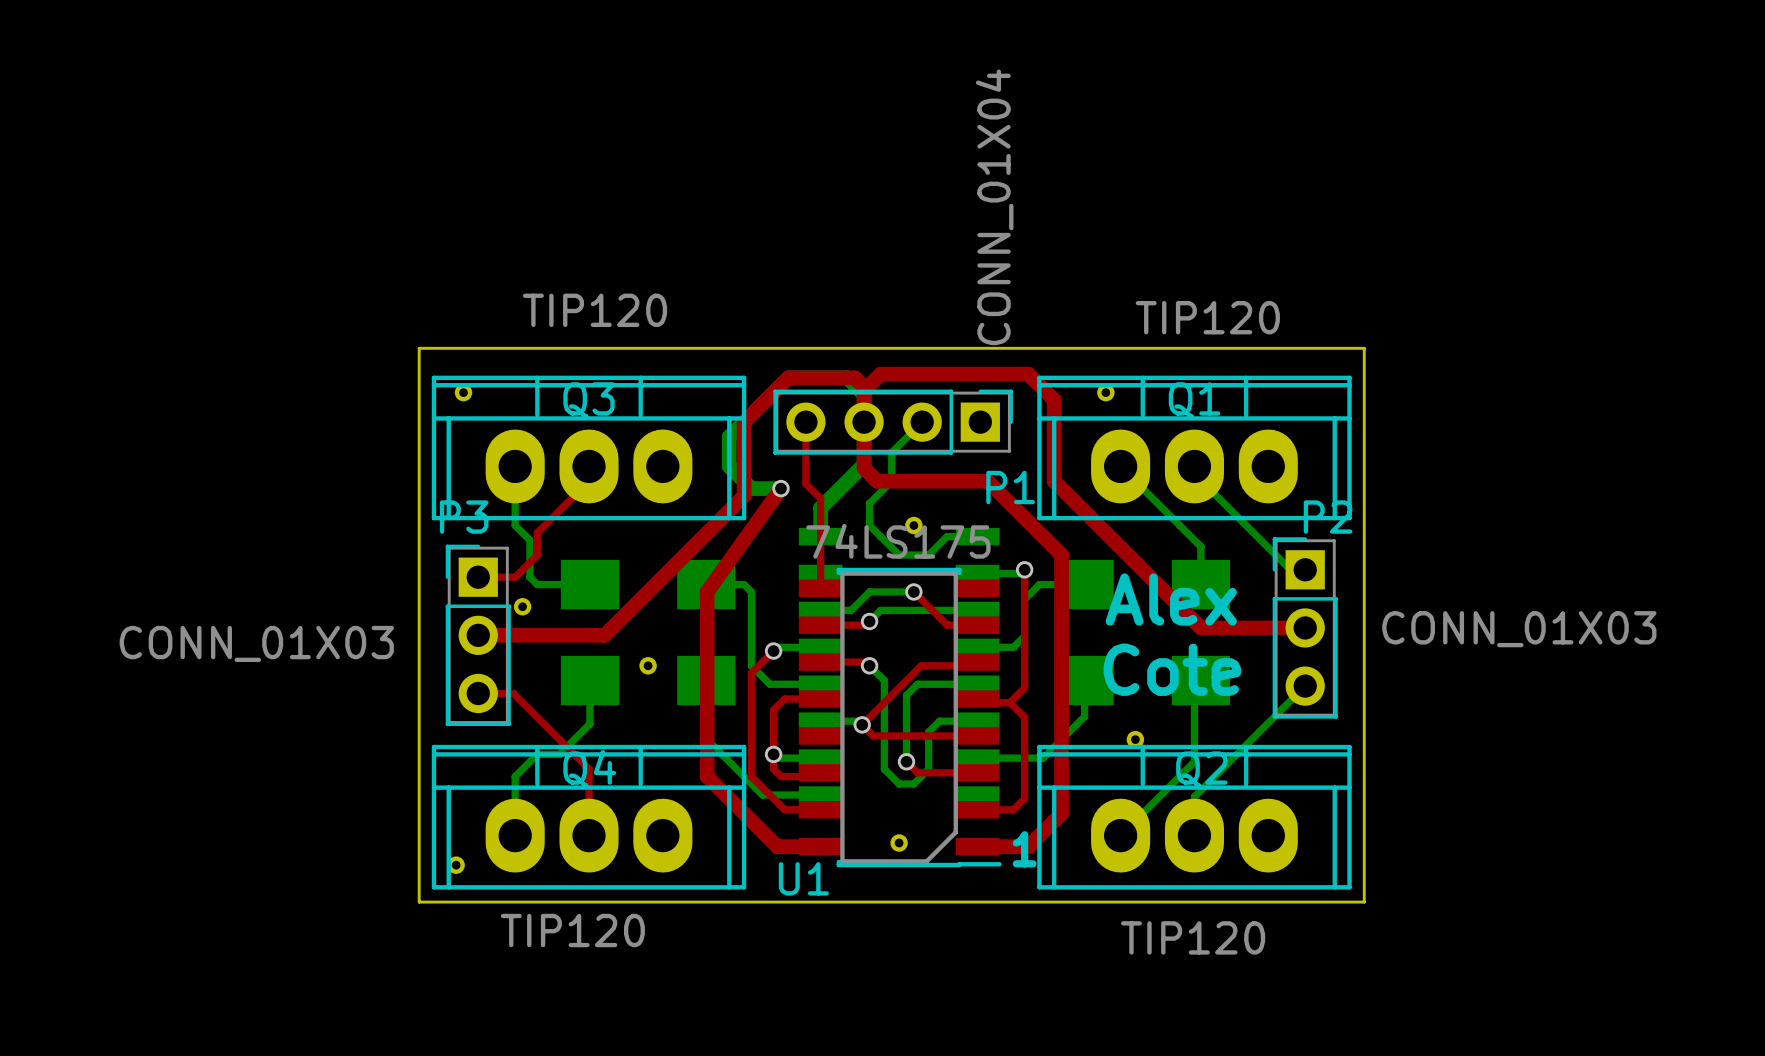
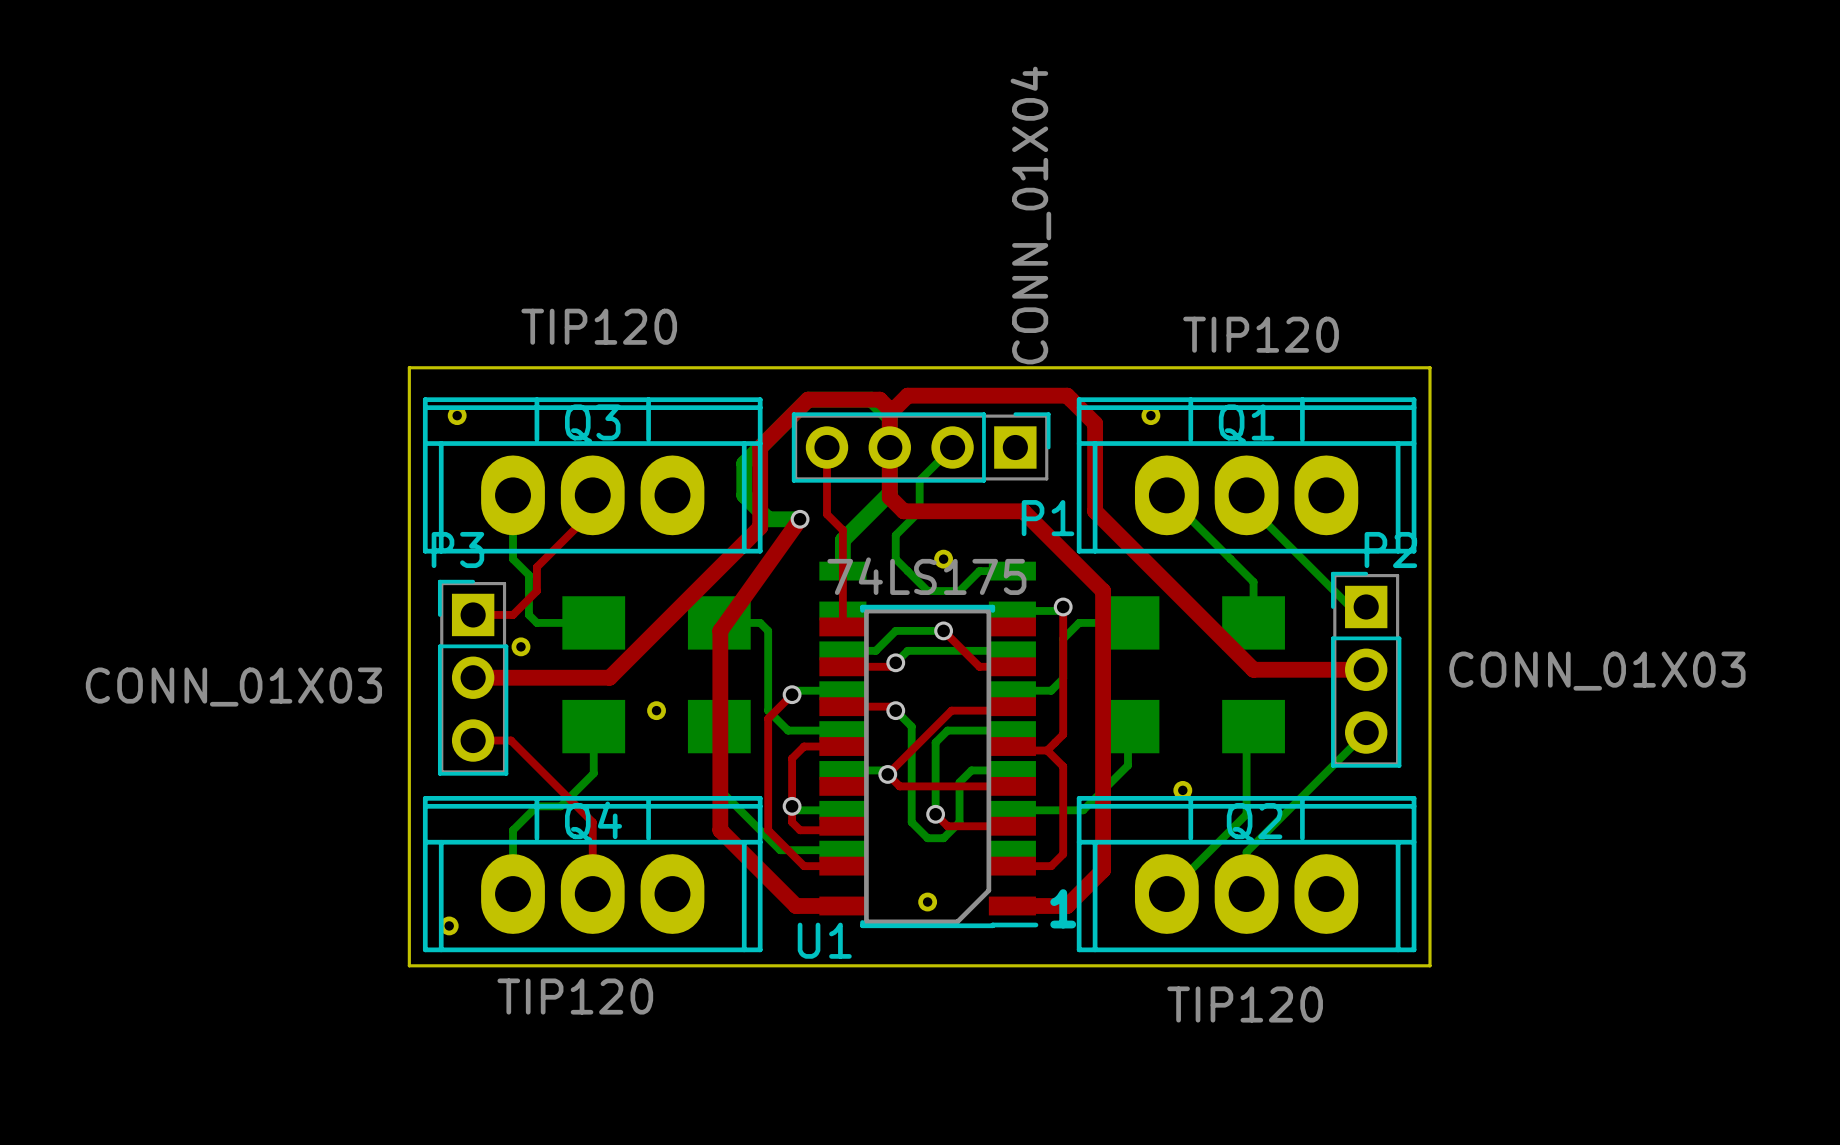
text: Alex (1171, 599) -> none
text: Cote (1172, 669) -> none

